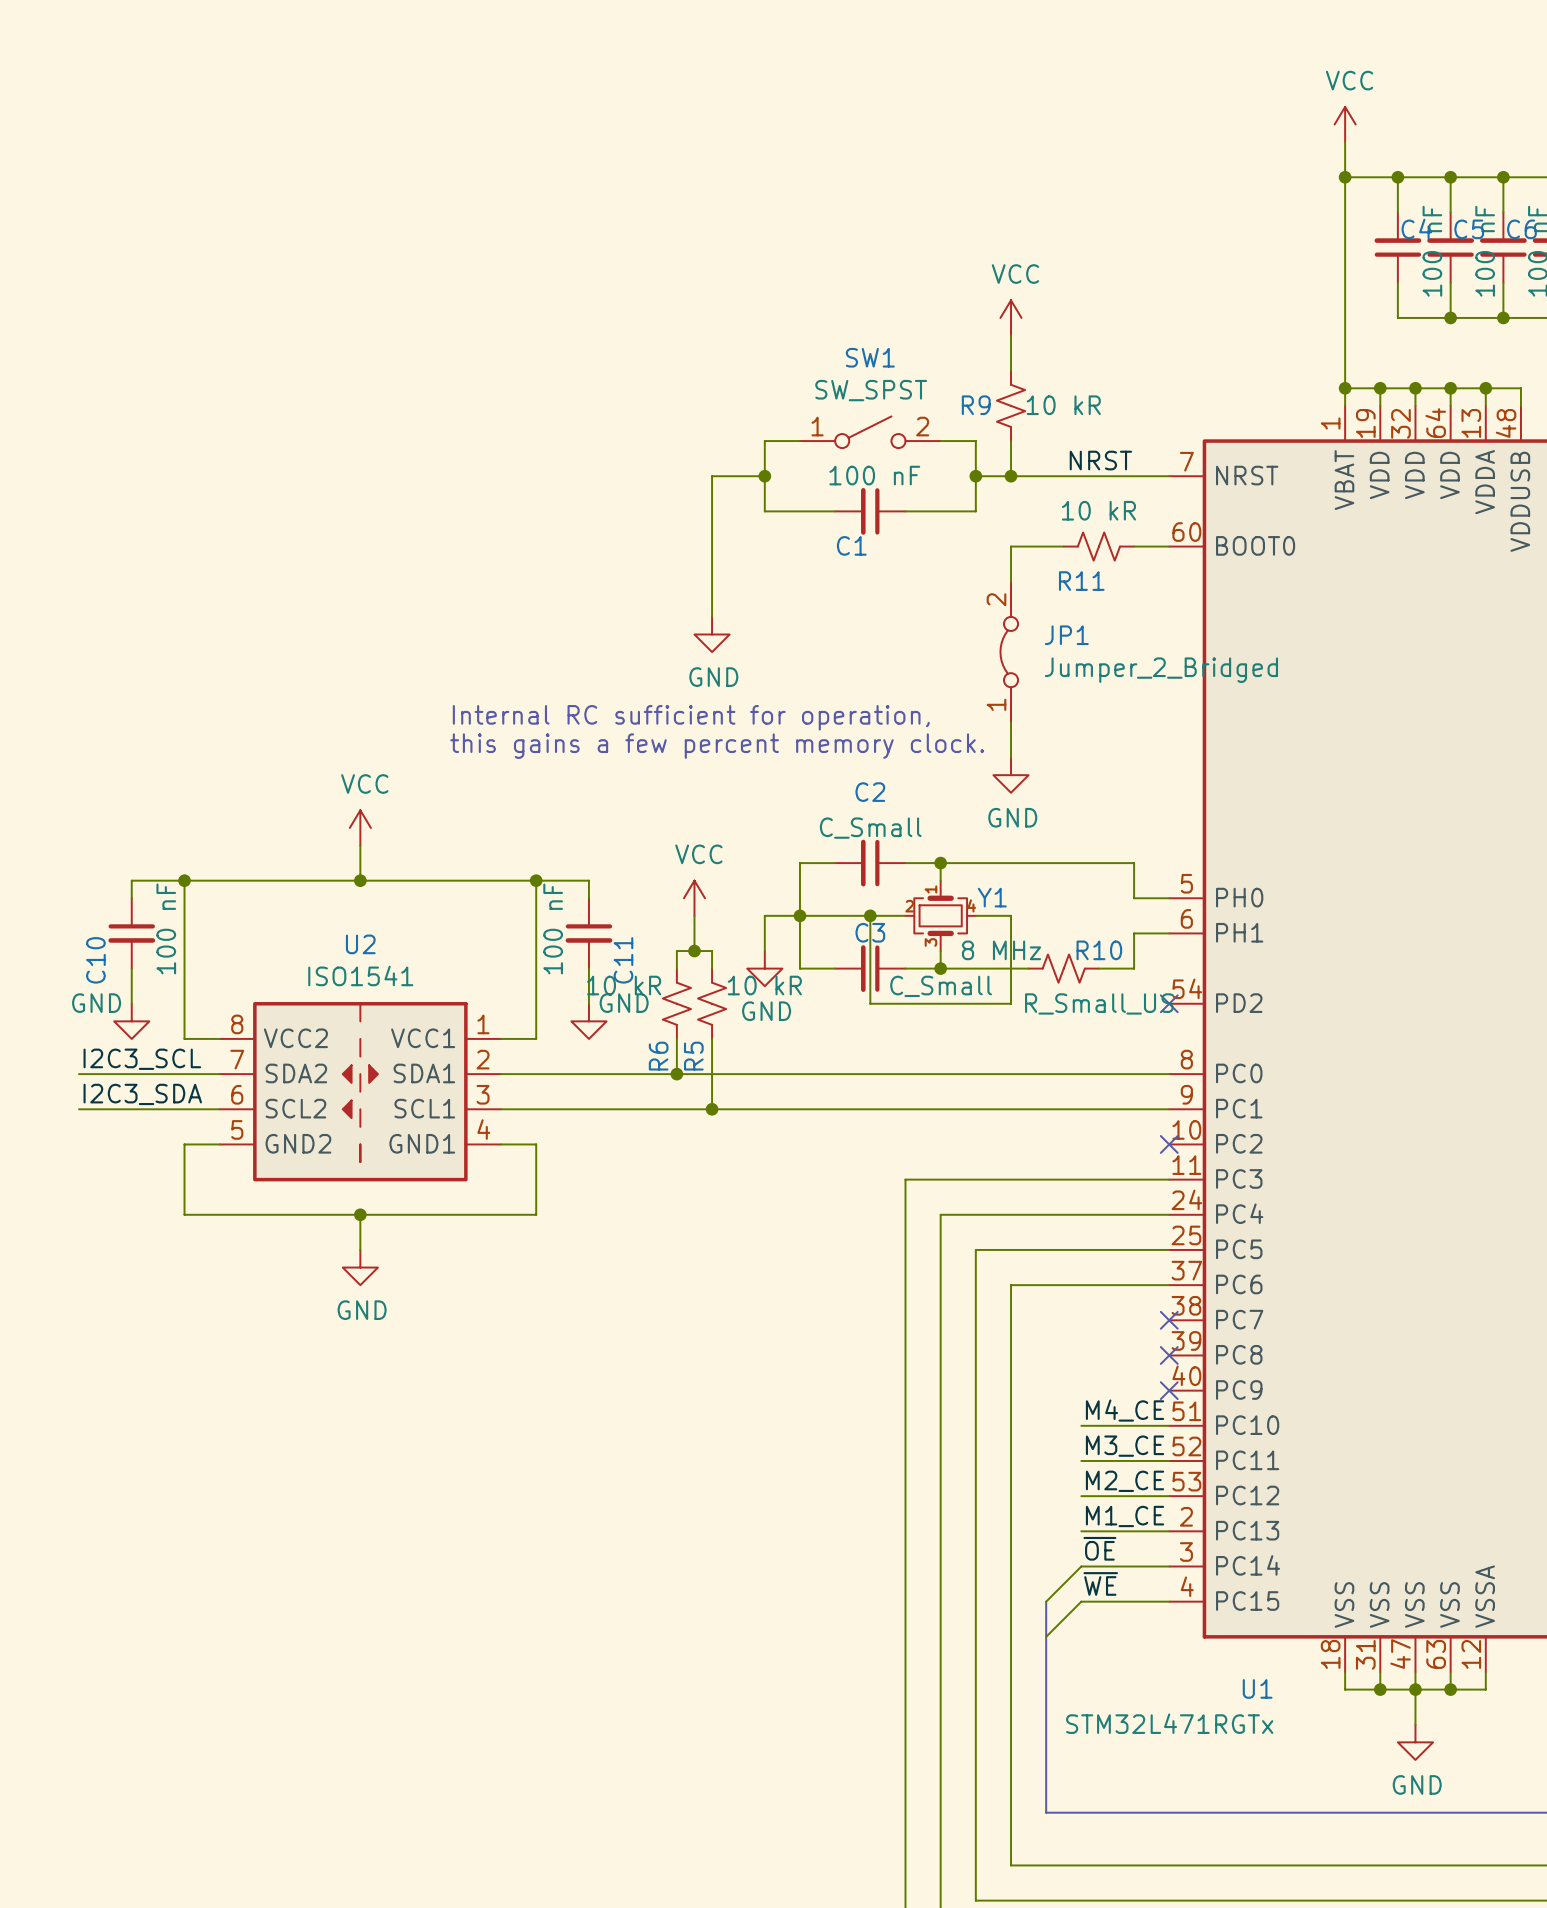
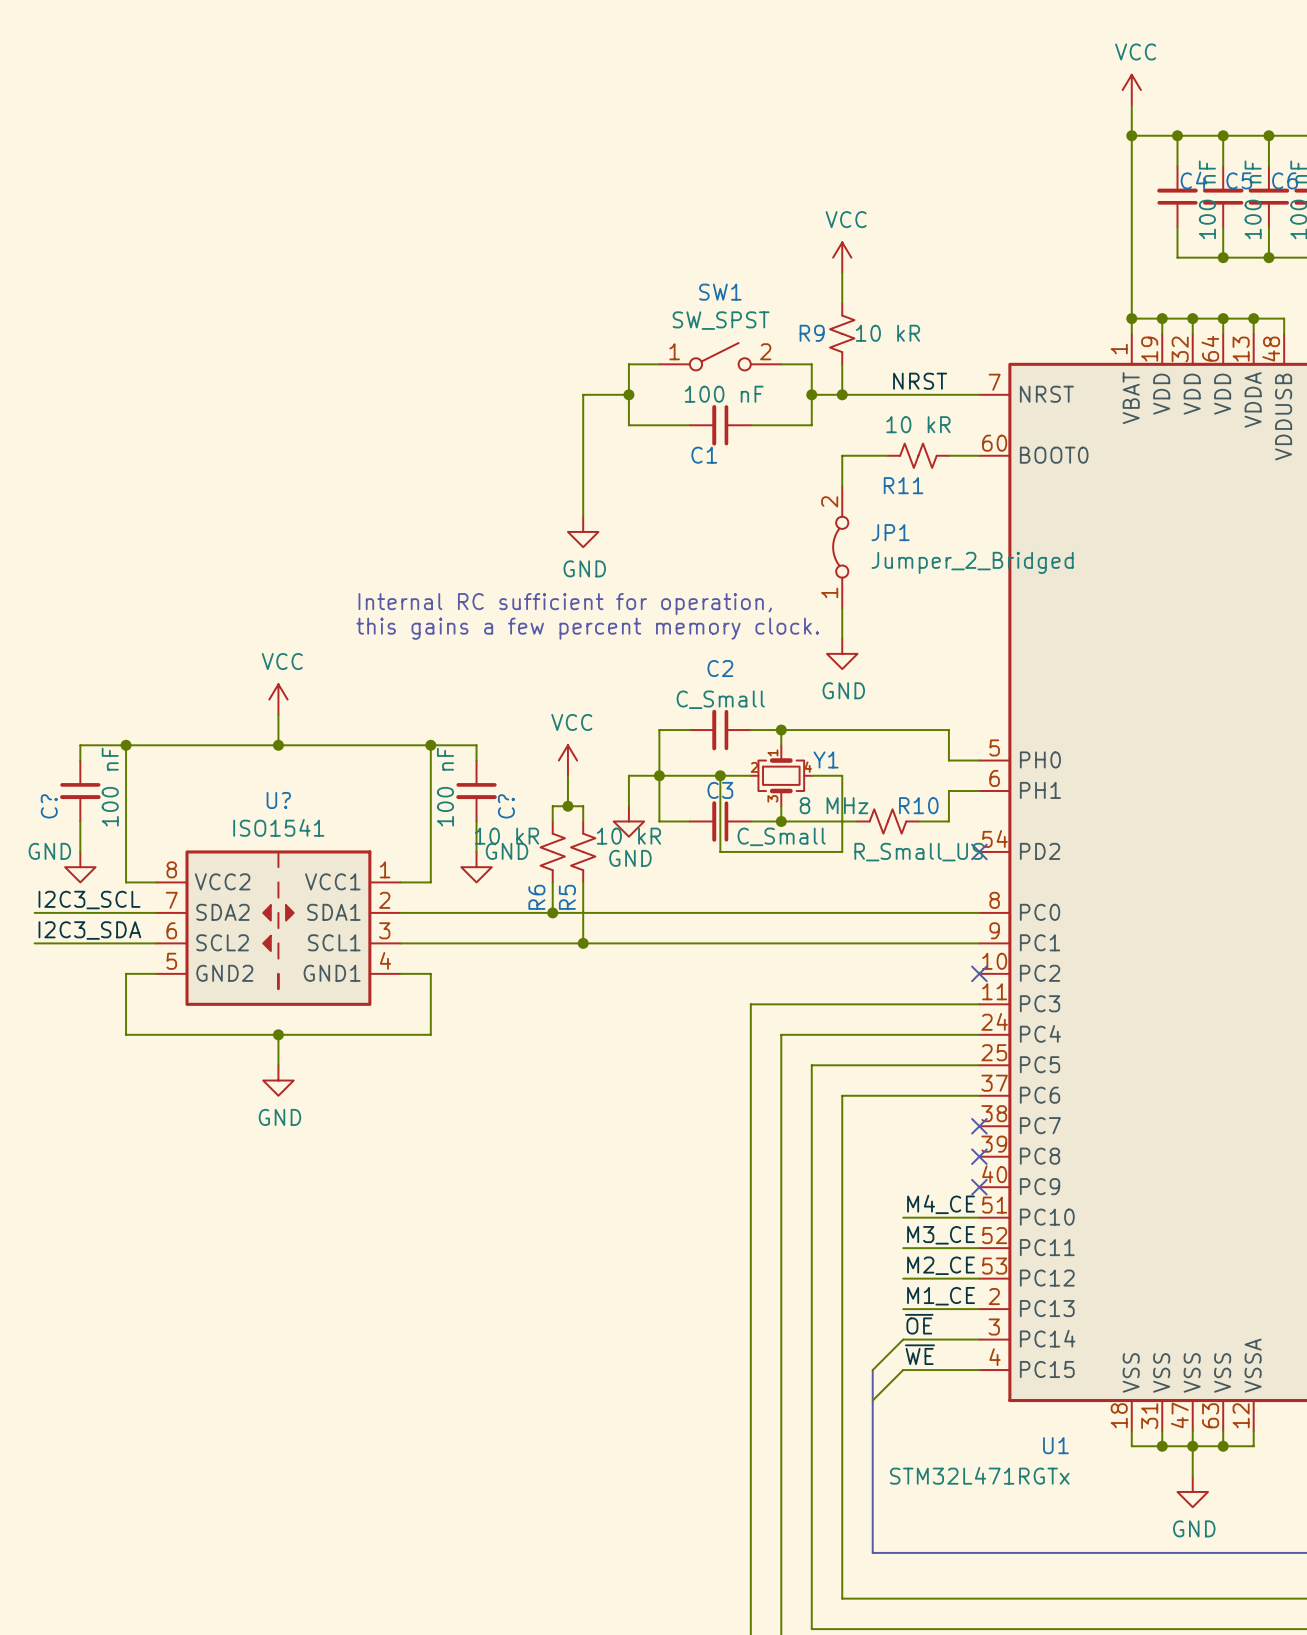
U2 name: U2 (360, 944) -> U? (278, 800)
C10 name: C10 (95, 960) -> C? (49, 806)
C11 name: C11 (623, 960) -> C? (506, 806)

